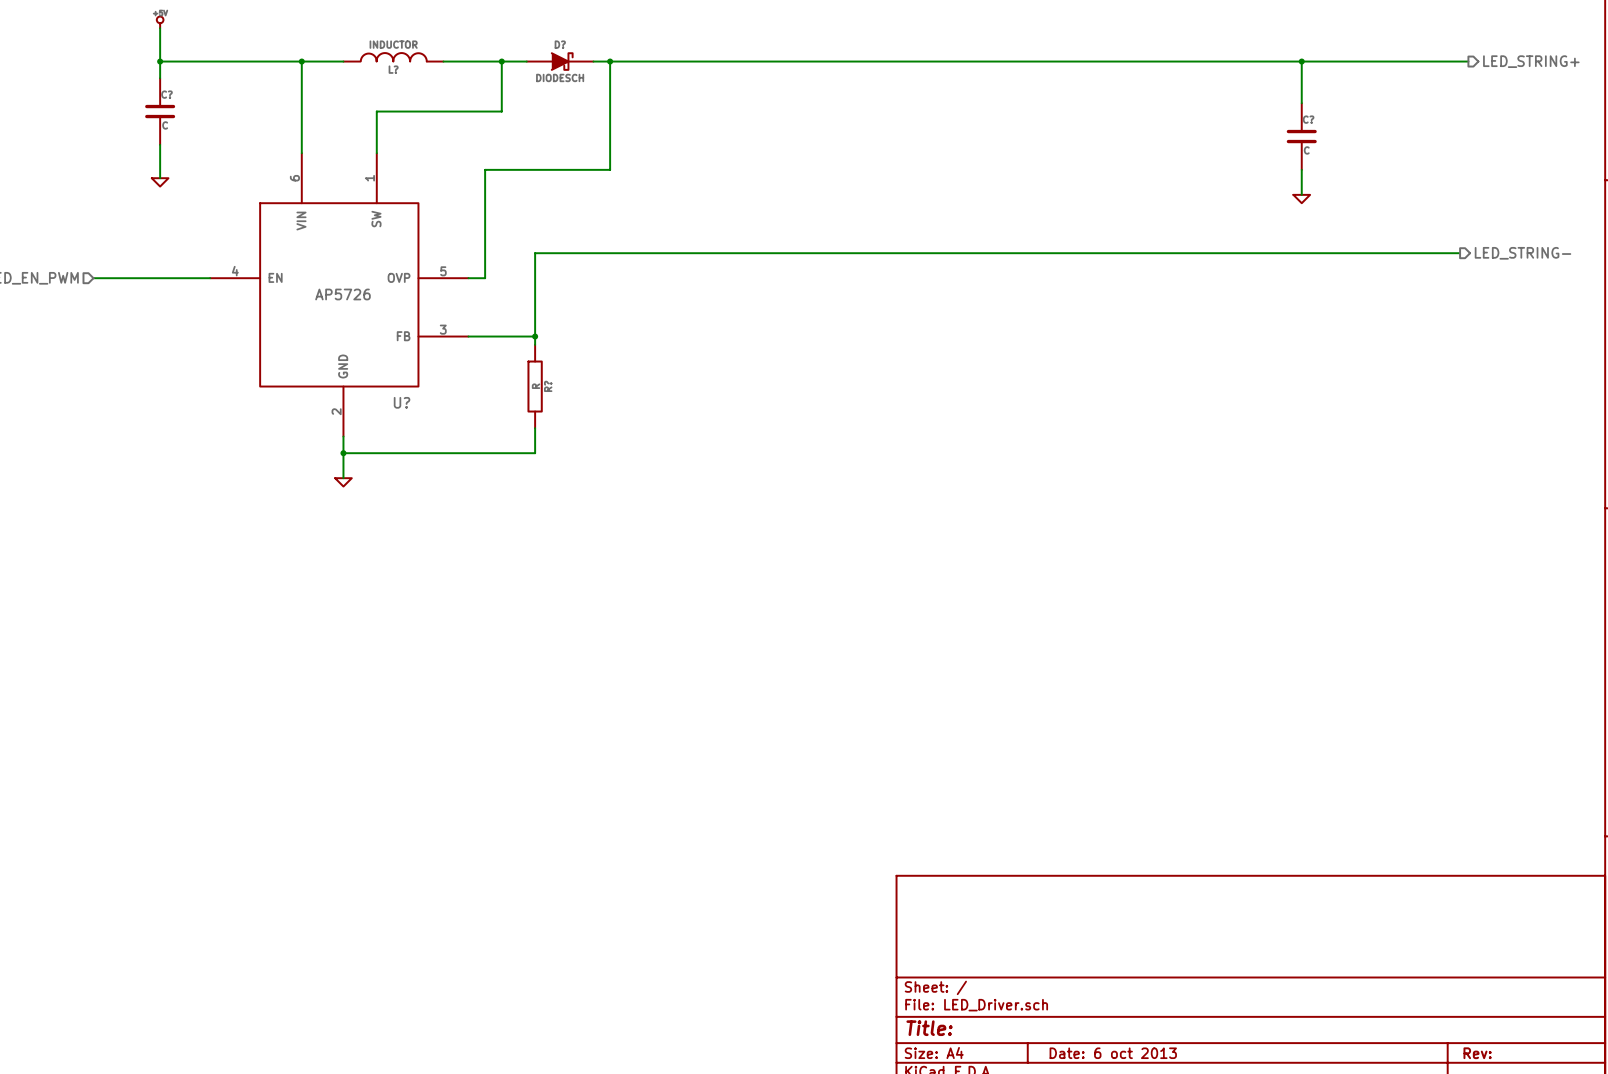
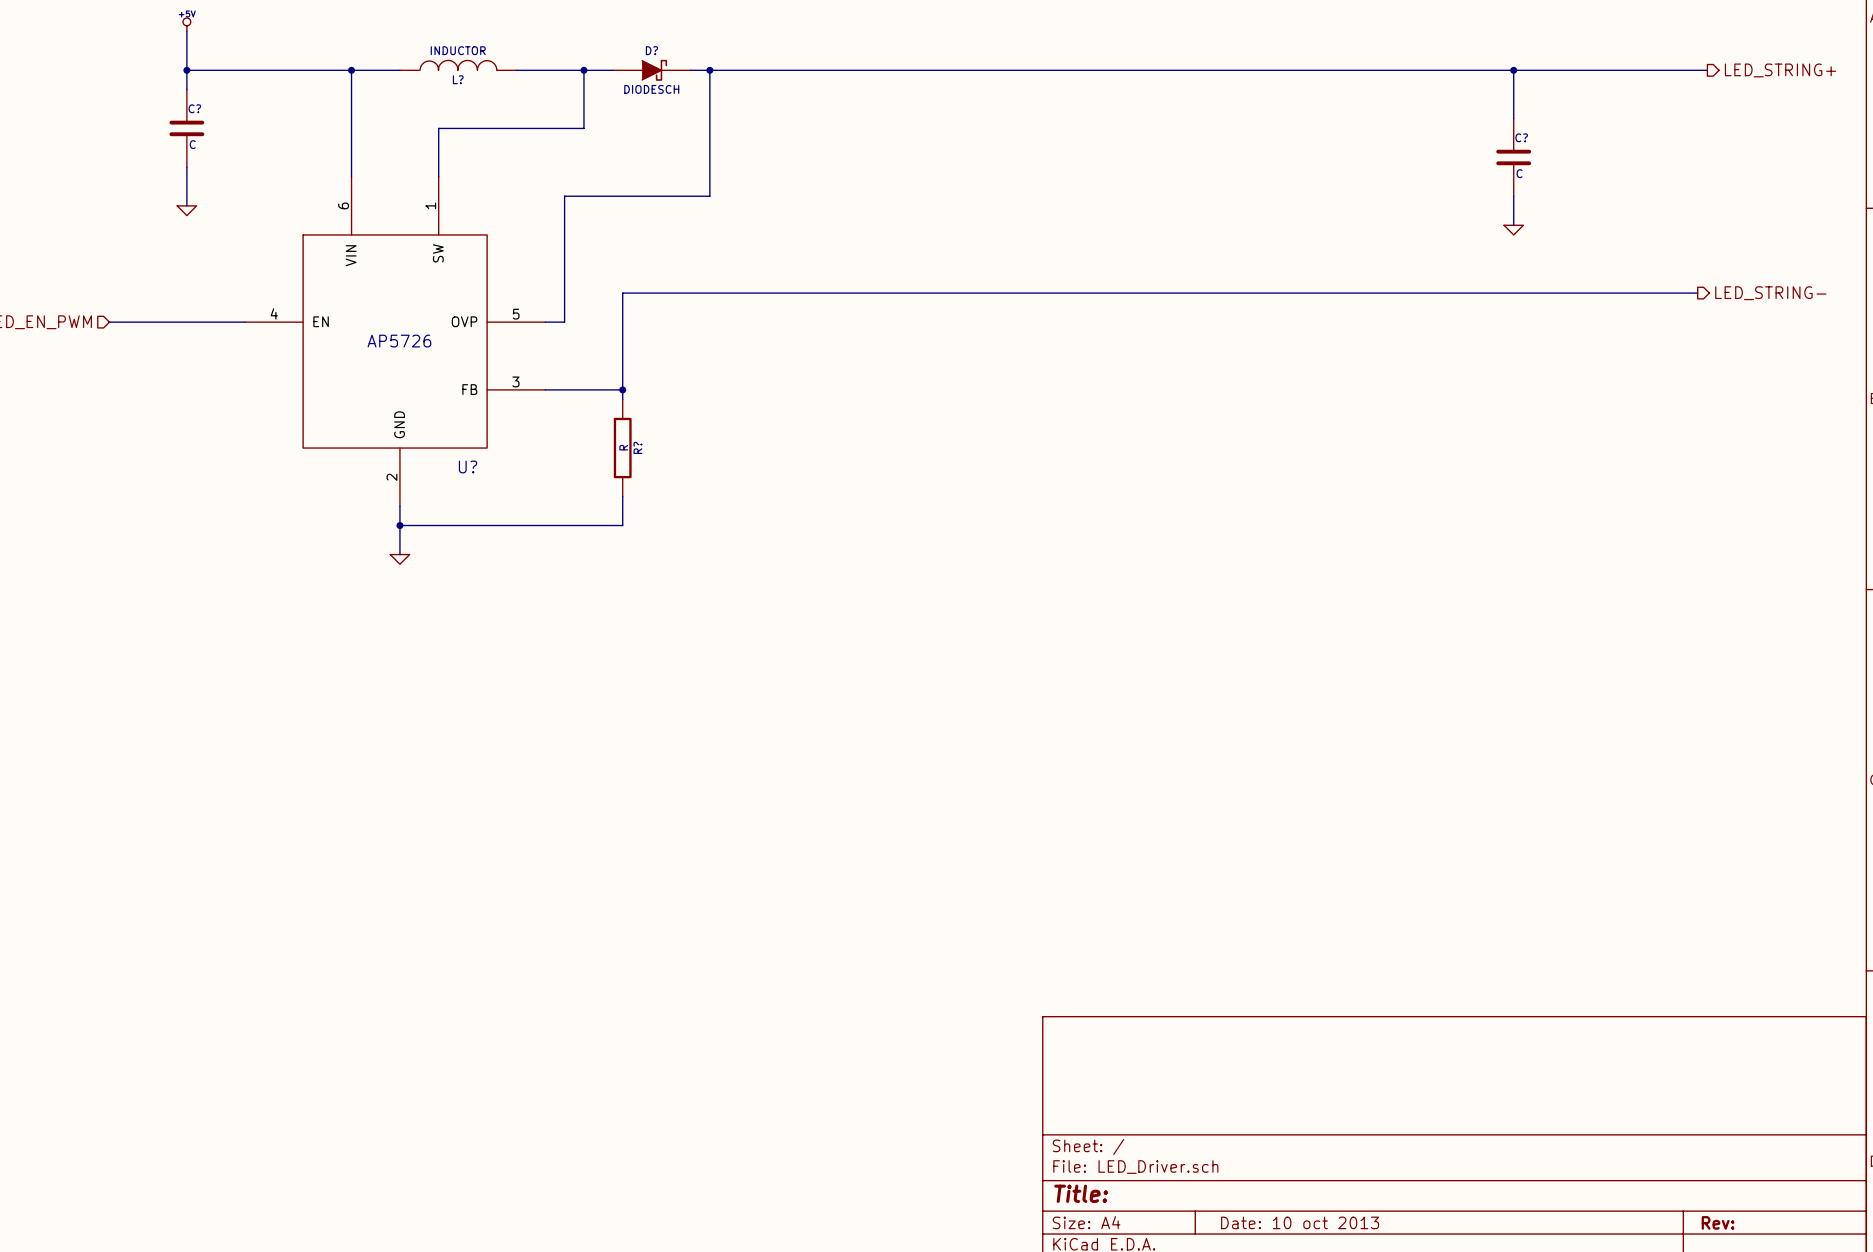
title block: Date: 6 oct 2013 (1113, 1053) -> Date: 10 oct 2013 (1300, 1222)

